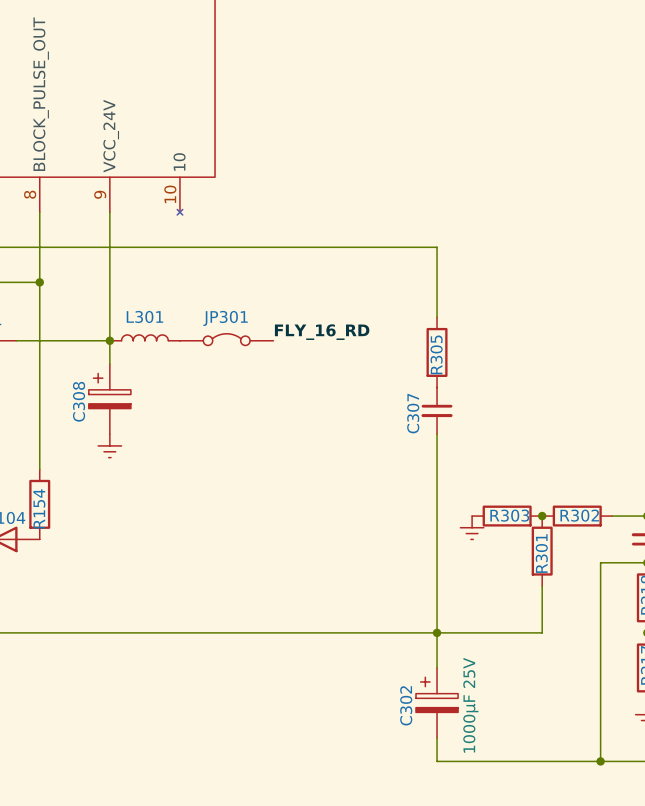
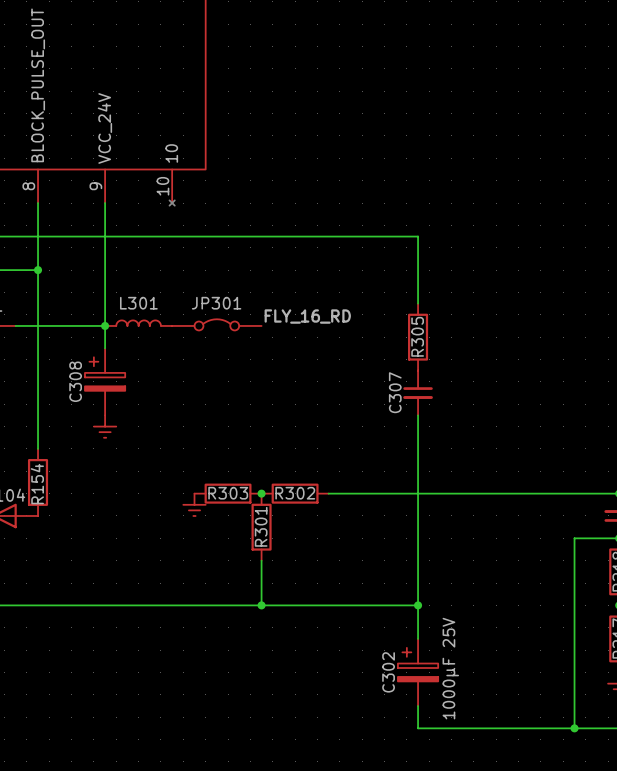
junction: none -> (261, 493)
wire: none -> (328, 493) (585, 493)
R303 position: (507, 516) -> (228, 493)
junction: (542, 516) -> none
R302 position: (577, 516) -> (295, 493)
power symbol: none -> (194, 504)
power symbol: (472, 527) -> none
R301 position: (542, 551) -> (261, 527)
wire: none -> (261, 560) (261, 605)
wire: (542, 586) (542, 632) (437, 632) -> none
junction: none -> (261, 605)

